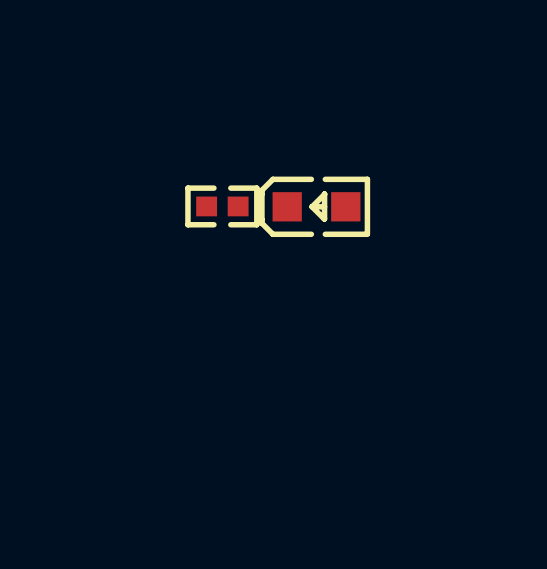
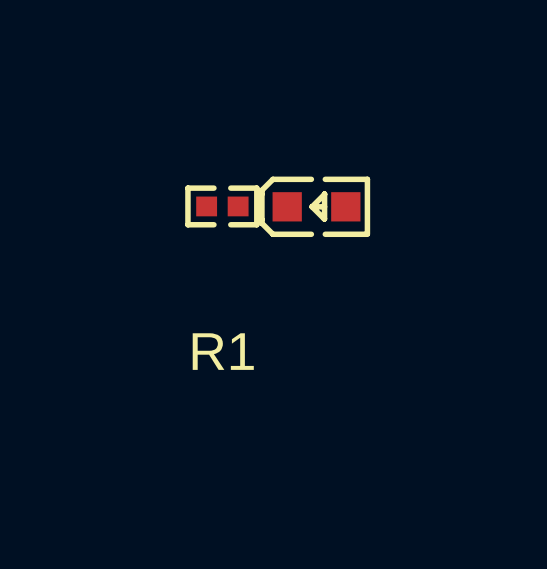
R1 name: none -> R1 (223, 351)

